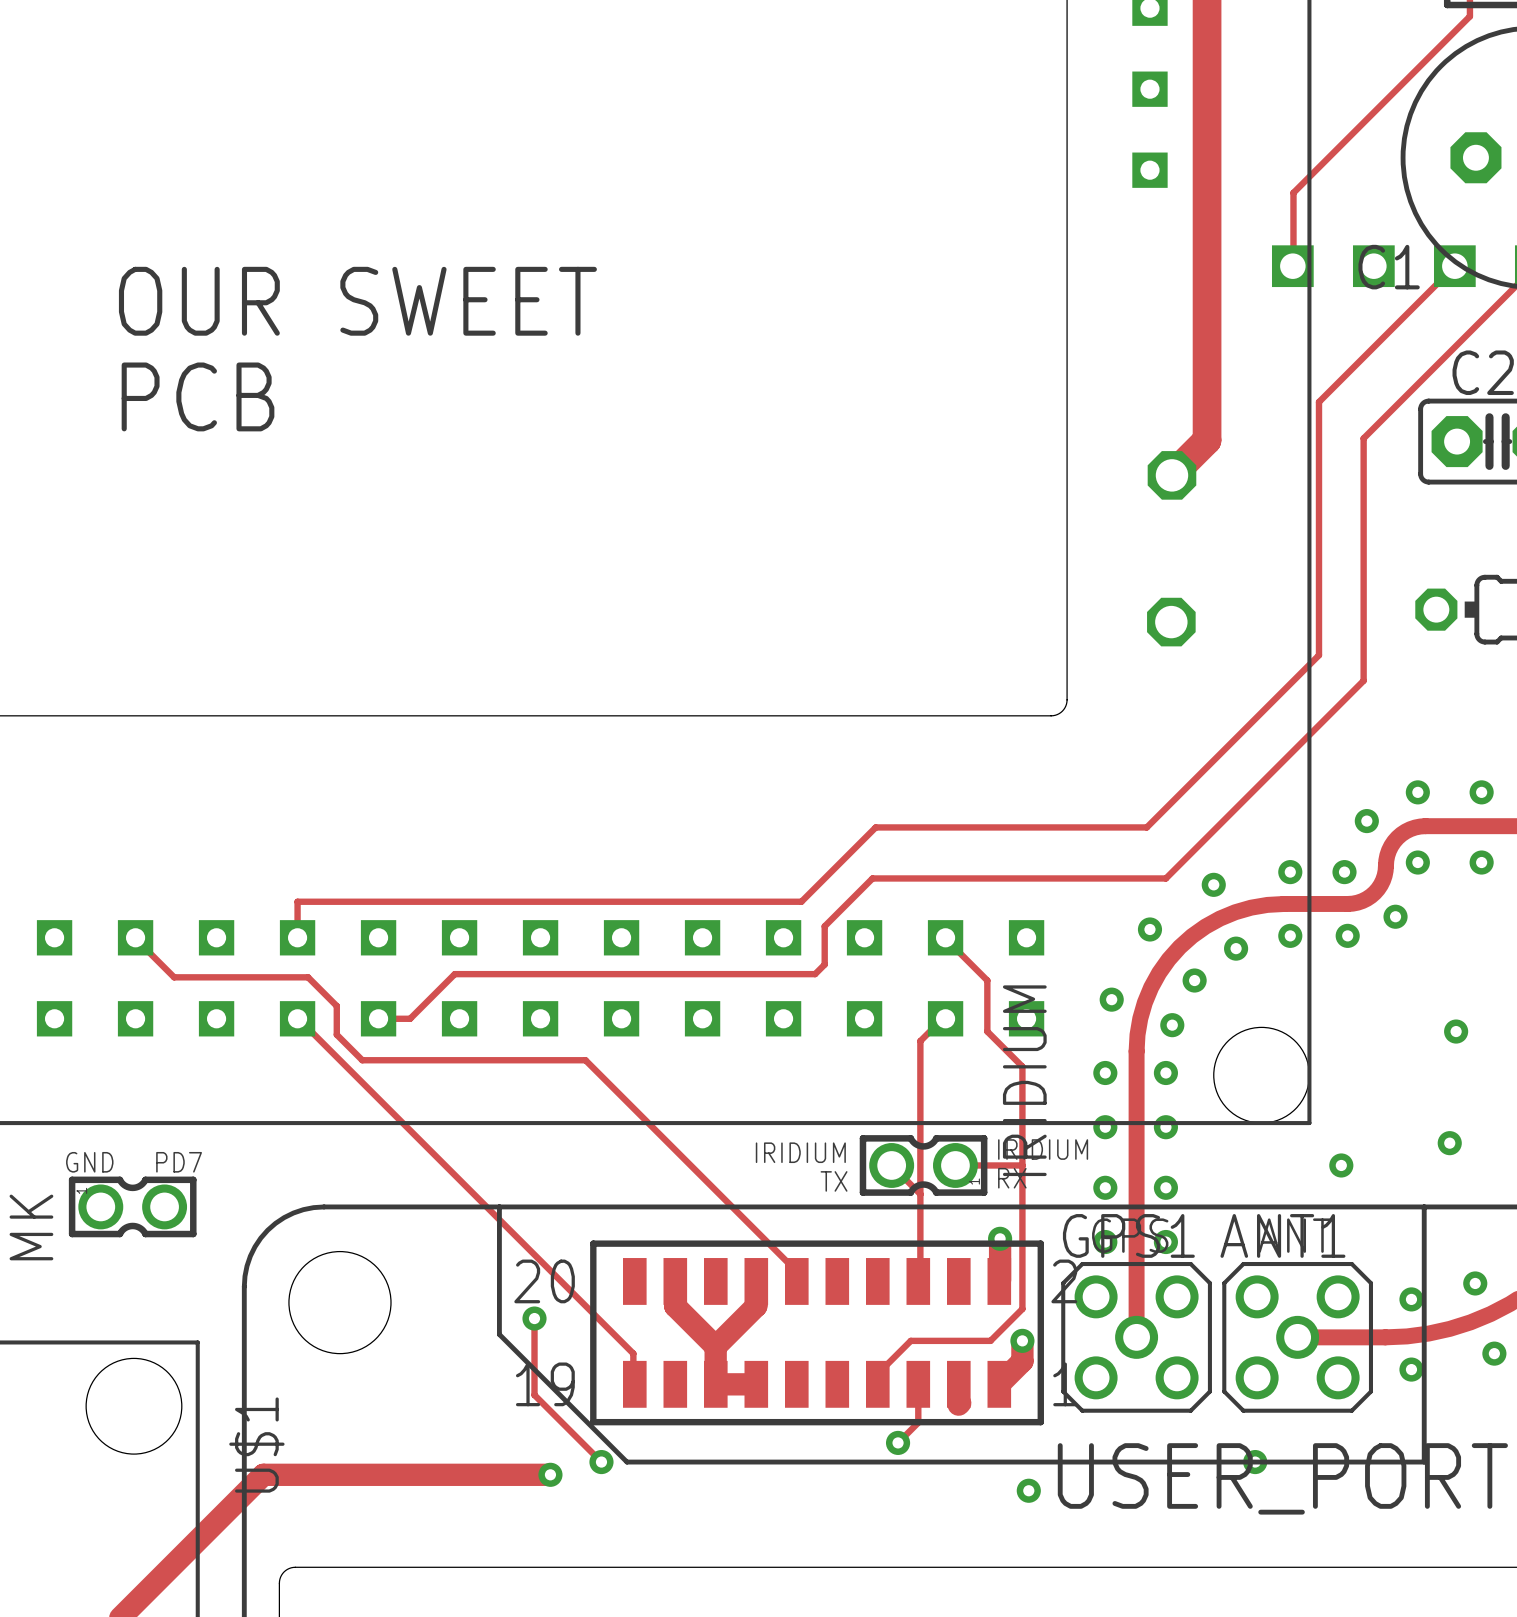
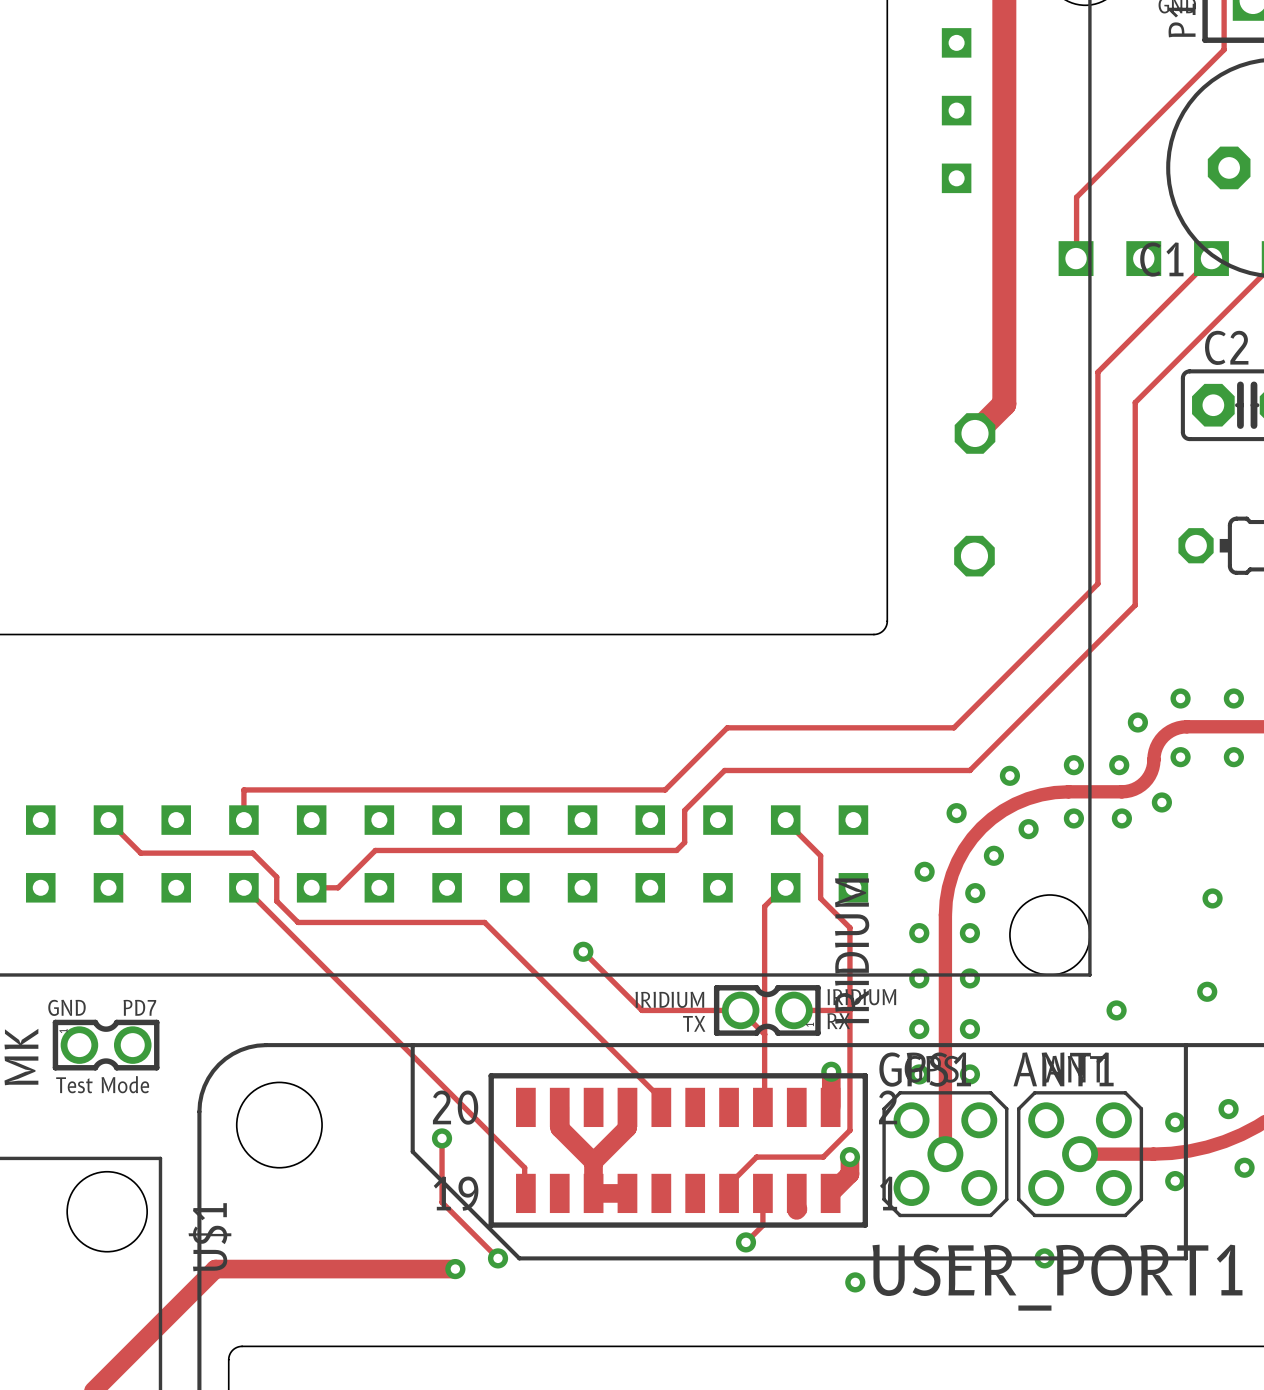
text: OUR SWEET (357, 301) -> none
text: PCB (198, 396) -> none
track: none -> (583, 951) (641, 1010) (740, 1010)
via: none -> (583, 951)
text: none -> Test Mode (102, 1084)

